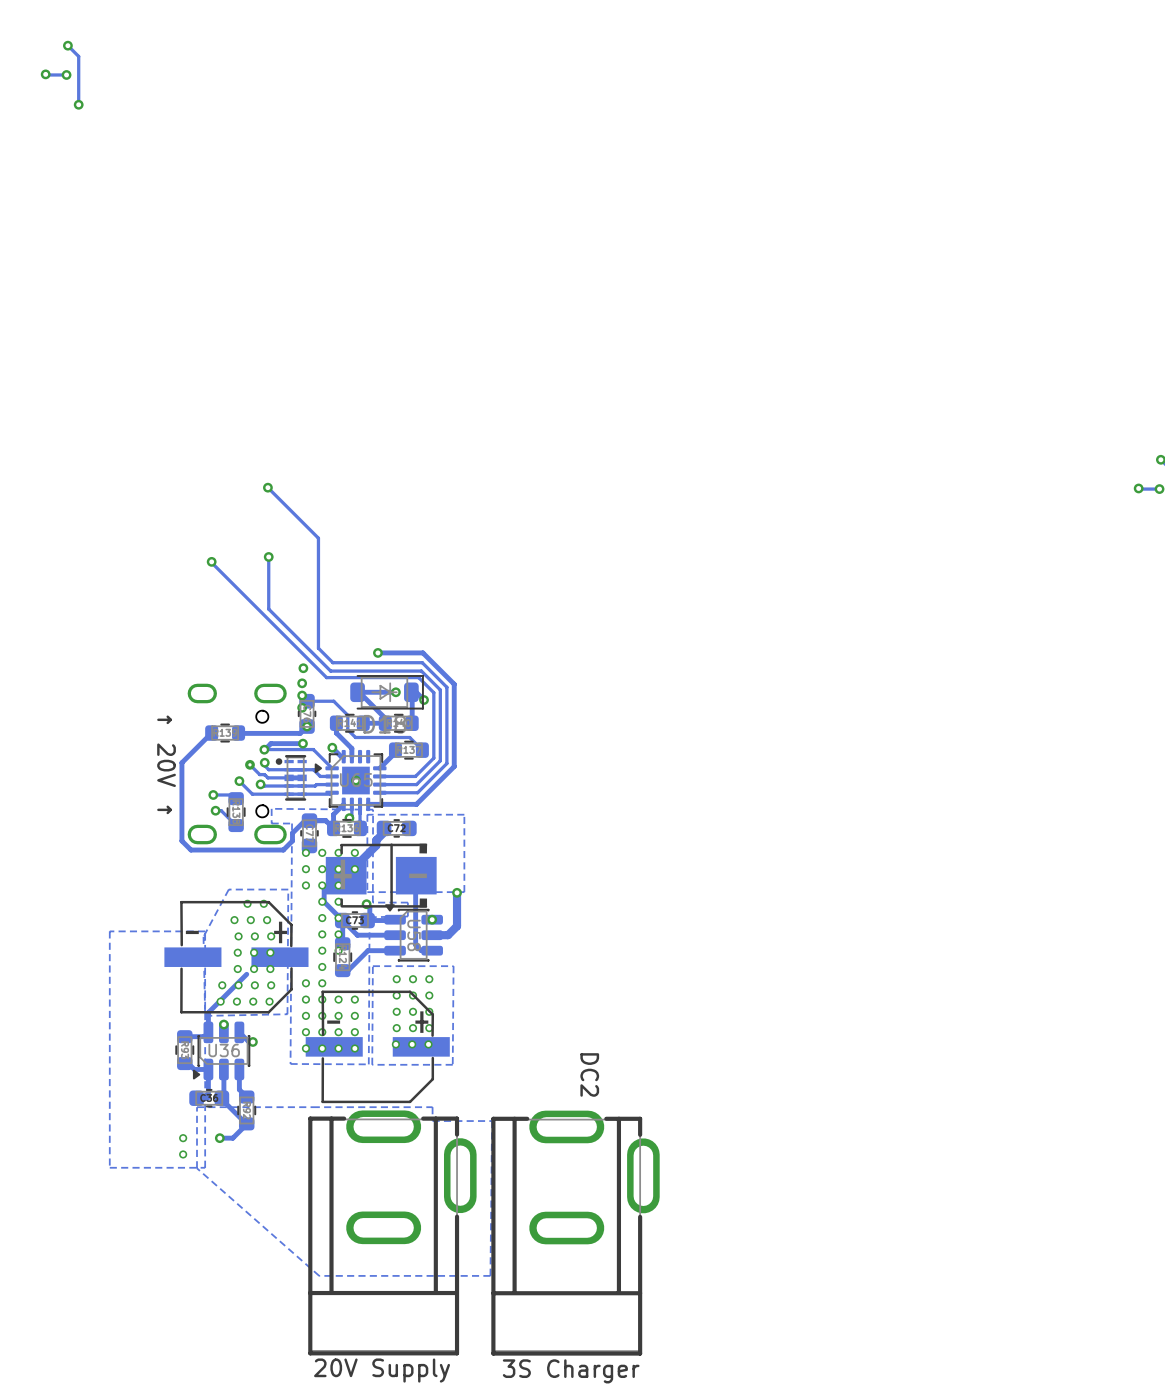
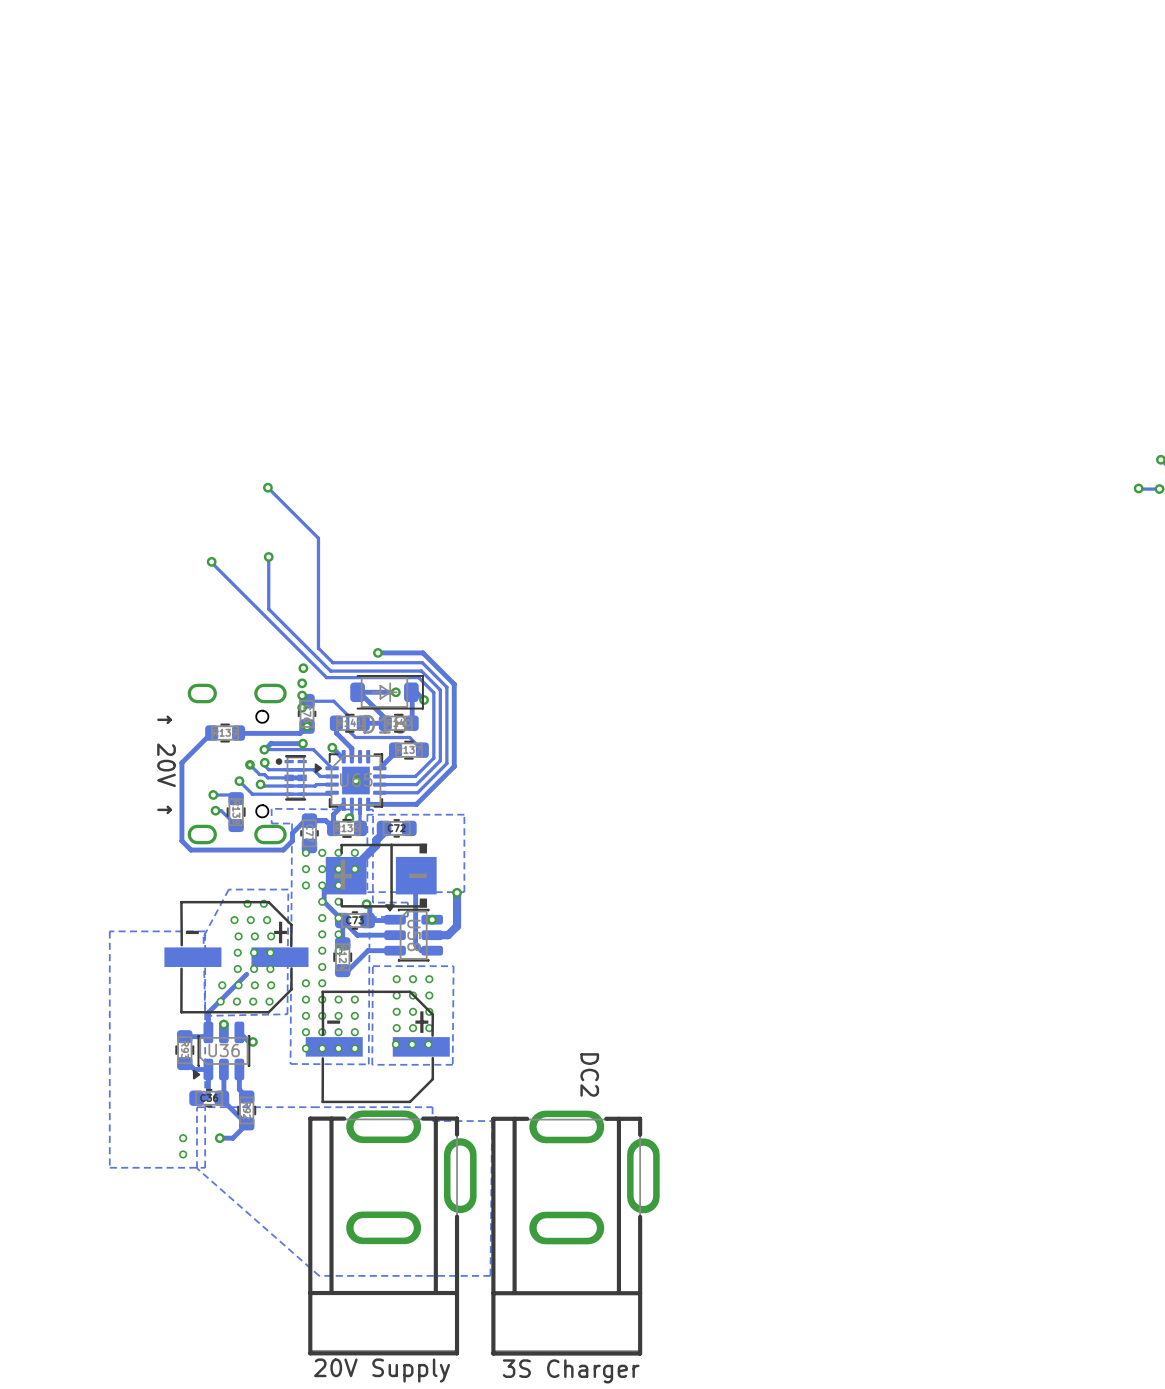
track: (67, 45) (78, 56) (78, 104) -> none
via: (67, 45) -> none
track: (45, 74) (66, 74) -> none
via: (45, 74) -> none
via: (66, 74) -> none
via: (78, 104) -> none

